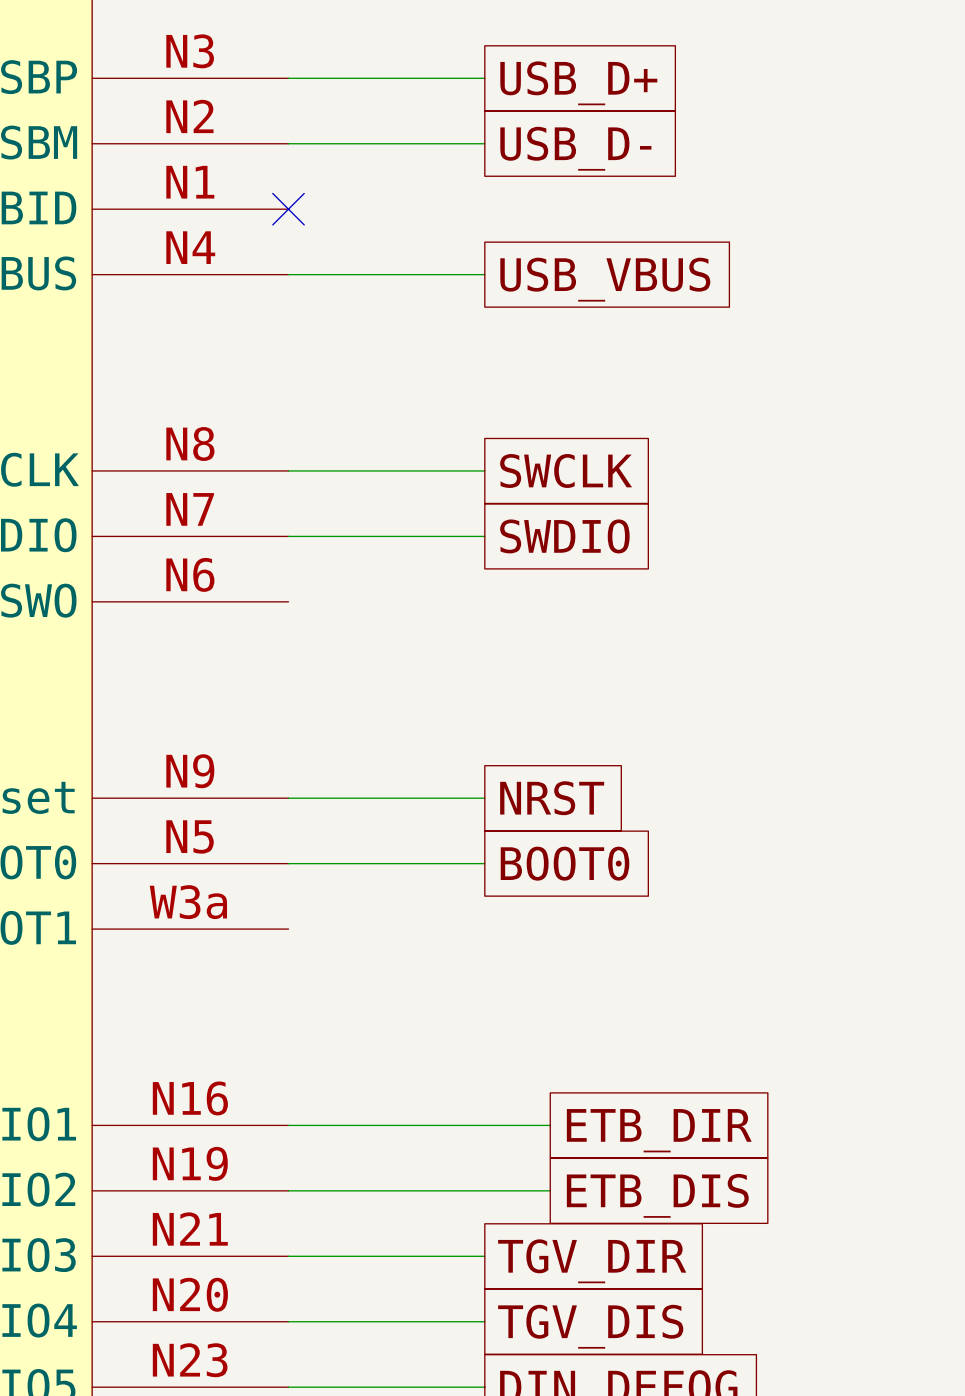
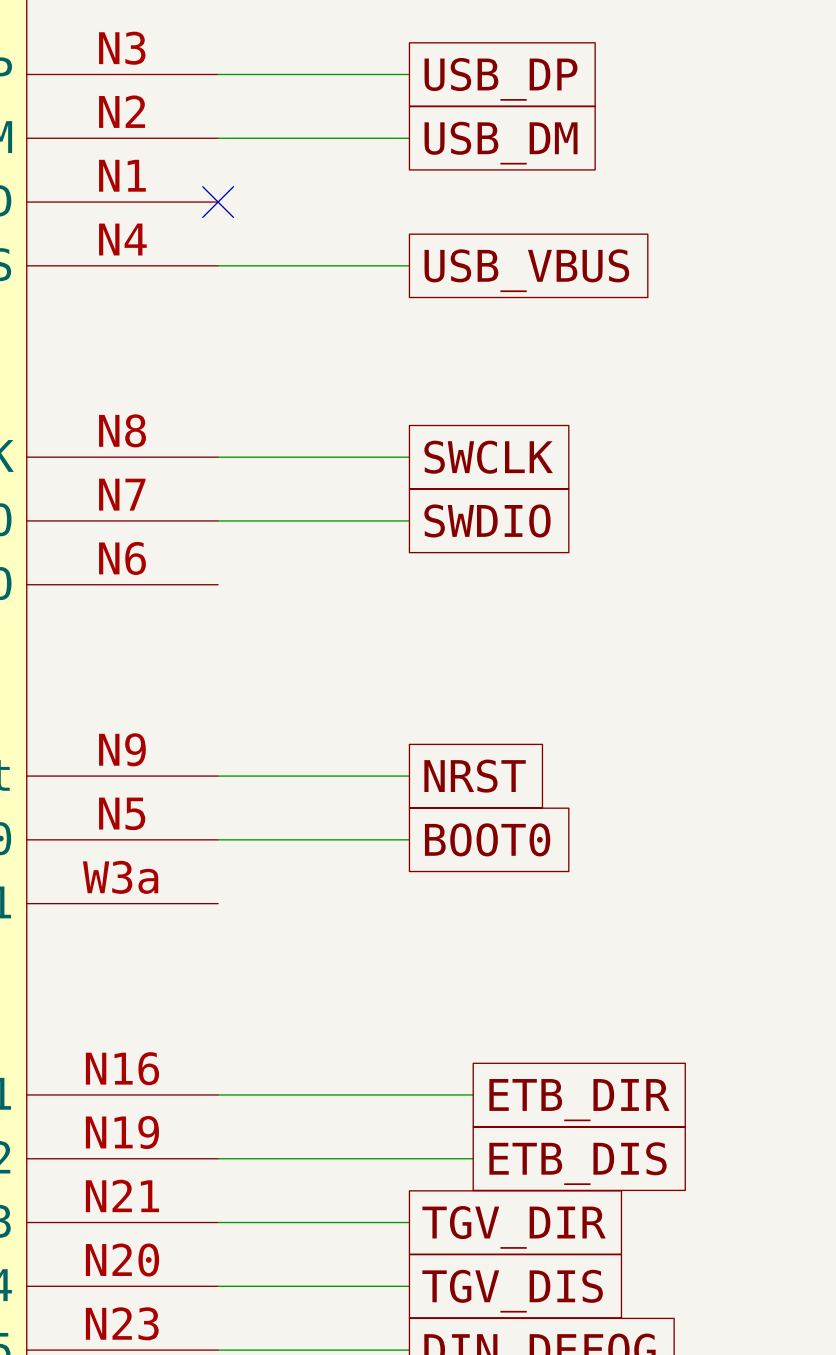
global label: USB_D+ (578, 83) -> USB_DP (500, 79)
global label: USB_D- (575, 148) -> USB_DM (501, 143)

